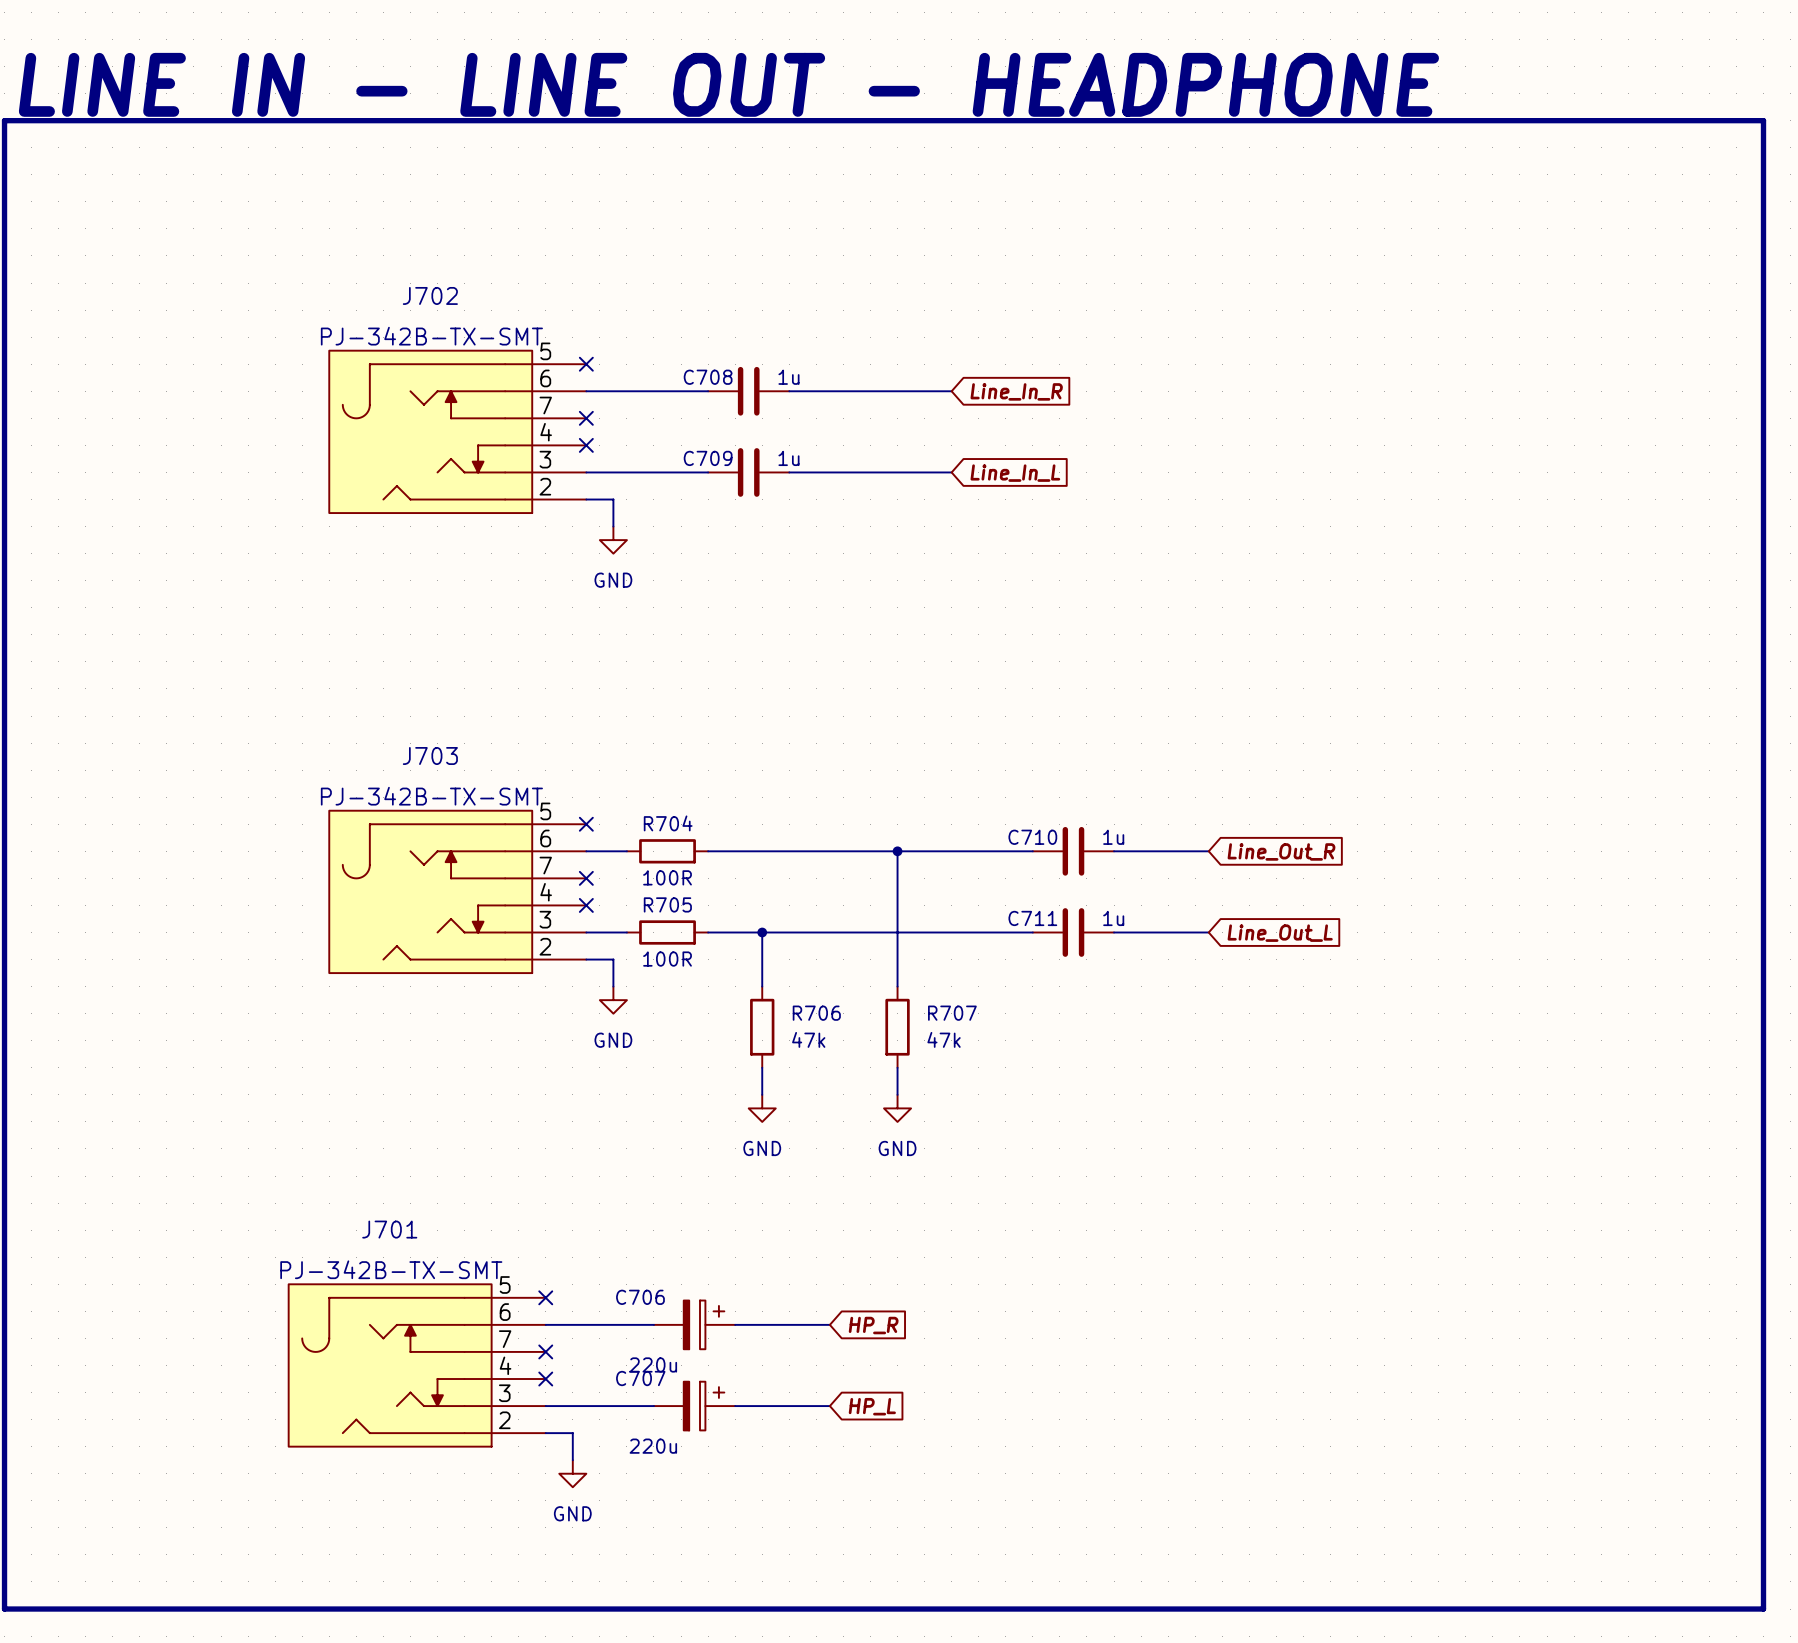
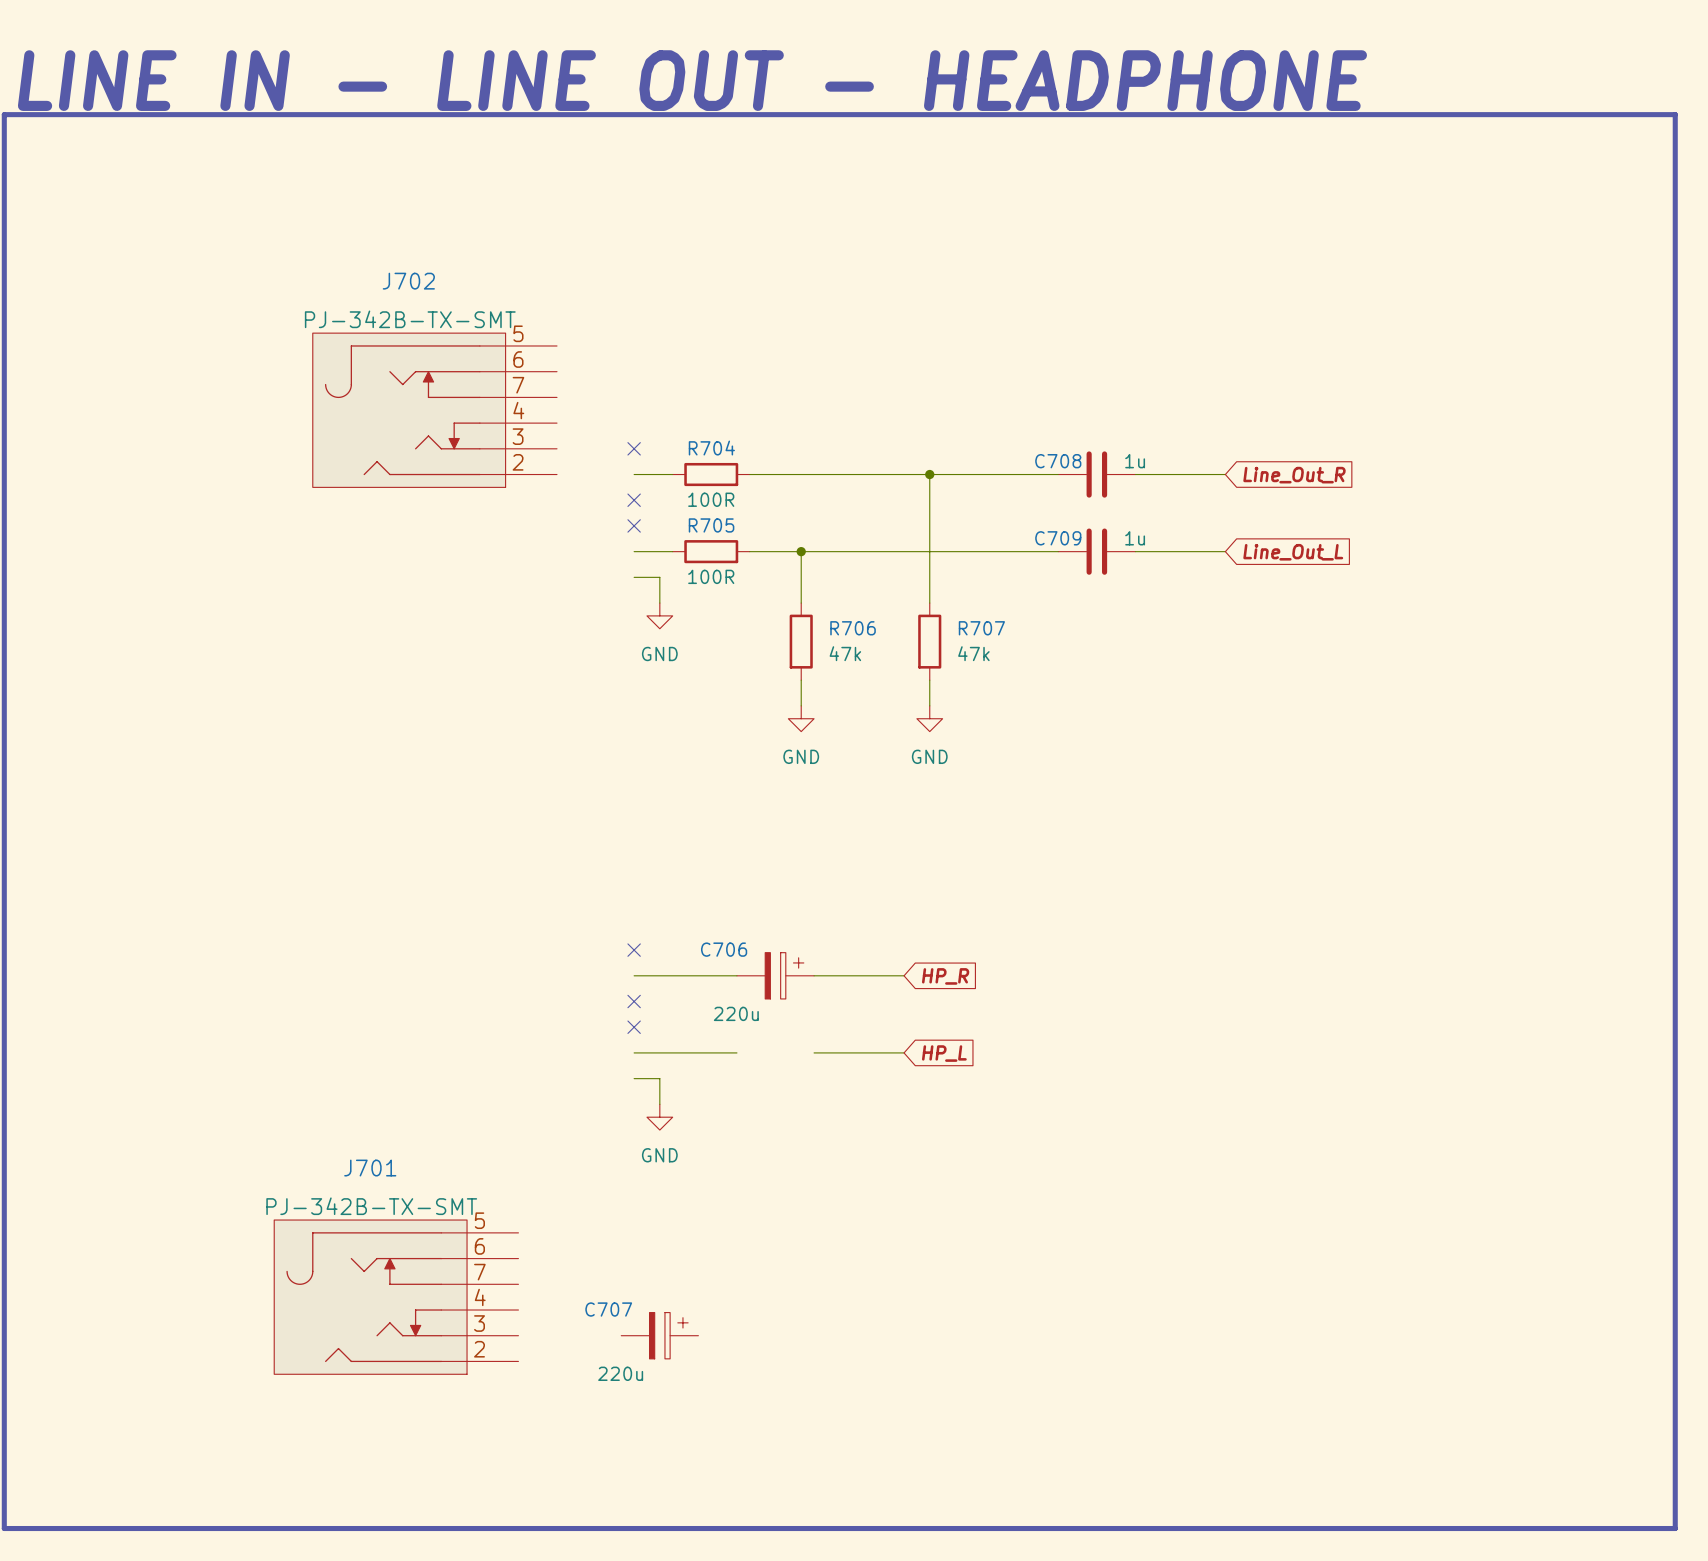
no-connect mark: (586, 364) -> none
wire: (586, 391) (708, 391) -> none
C708 position: (748, 391) -> (1096, 474)
wire: (789, 391) (951, 391) -> none
global label: Line_In_R (1016, 391) -> none
no-connect mark: (586, 418) -> none
no-connect mark: (586, 445) -> none
wire: (586, 472) (708, 472) -> none
no-connect mark: none -> (634, 448)
C709 position: (748, 472) -> (1096, 551)
wire: (789, 472) (951, 472) -> none
global label: Line_In_L (1015, 473) -> none
wire: (586, 499) (613, 499) (613, 526) -> (634, 577) (659, 577) (659, 603)
wire: none -> (634, 474) (672, 474)
wire: none -> (749, 474) (1058, 474)
wire: none -> (929, 474) (929, 603)
junction: none -> (929, 474)
wire: none -> (1135, 474) (1225, 474)
global label: none -> Line_Out_R (1294, 475)
no-connect mark: none -> (634, 500)
power symbol position: GND (613, 540) -> GND (659, 615)
no-connect mark: none -> (634, 525)
wire: none -> (634, 551) (672, 551)
wire: none -> (749, 551) (1058, 551)
wire: none -> (801, 551) (801, 603)
junction: none -> (801, 551)
wire: none -> (1135, 551) (1225, 551)
global label: none -> Line_Out_L (1293, 552)
wire: none -> (801, 680) (801, 705)
wire: none -> (929, 680) (929, 705)
power symbol: none -> GND (801, 718)
power symbol: none -> GND (929, 718)
no-connect mark: (586, 824) -> none
wire: (586, 851) (626, 851) -> none
R704 position: (667, 851) -> (711, 474)
wire: (708, 851) (1032, 851) -> none
wire: (897, 851) (897, 986) -> none
junction: (897, 851) -> none
C710: 1u (1073, 851) -> none
wire: (1114, 851) (1208, 851) -> none
global label: Line_Out_R (1281, 851) -> none
no-connect mark: (586, 878) -> none
J703: PJ-342B-TX-SMT (457, 891) -> none
no-connect mark: (586, 905) -> none
wire: (586, 932) (626, 932) -> none
R705 position: (667, 932) -> (711, 551)
wire: (708, 932) (1032, 932) -> none
wire: (762, 932) (762, 986) -> none
junction: (762, 932) -> none
C711: 1u (1073, 932) -> none
wire: (1114, 932) (1208, 932) -> none
global label: Line_Out_L (1280, 933) -> none
wire: (586, 959) (613, 959) (613, 986) -> (634, 1078) (659, 1078) (659, 1104)
power symbol: GND (613, 1000) -> none
no-connect mark: none -> (634, 950)
wire: none -> (634, 975) (736, 975)
R706 position: (762, 1027) -> (801, 641)
wire: none -> (814, 975) (904, 975)
R707 position: (897, 1027) -> (929, 641)
global label: none -> HP_R (945, 976)
no-connect mark: none -> (634, 1001)
wire: (762, 1067) (762, 1094) -> none
wire: (897, 1067) (897, 1094) -> none
no-connect mark: none -> (634, 1027)
power symbol position: GND (762, 1108) -> GND (659, 1117)
power symbol: GND (897, 1108) -> none
global label: none -> HP_L (944, 1053)
no-connect mark: (545, 1297) -> none
wire: (545, 1324) (653, 1324) -> (634, 1052) (736, 1052)
C706 position: (694, 1324) -> (775, 975)
wire: (735, 1324) (829, 1324) -> (814, 1052) (904, 1052)
global label: HP_R (873, 1325) -> none
no-connect mark: (545, 1351) -> none
no-connect mark: (545, 1379) -> none
wire: (545, 1406) (653, 1406) -> none
wire: (735, 1406) (829, 1406) -> none
global label: HP_L (872, 1406) -> none
wire: (545, 1433) (572, 1433) (572, 1460) -> none
power symbol: GND (572, 1473) -> none

